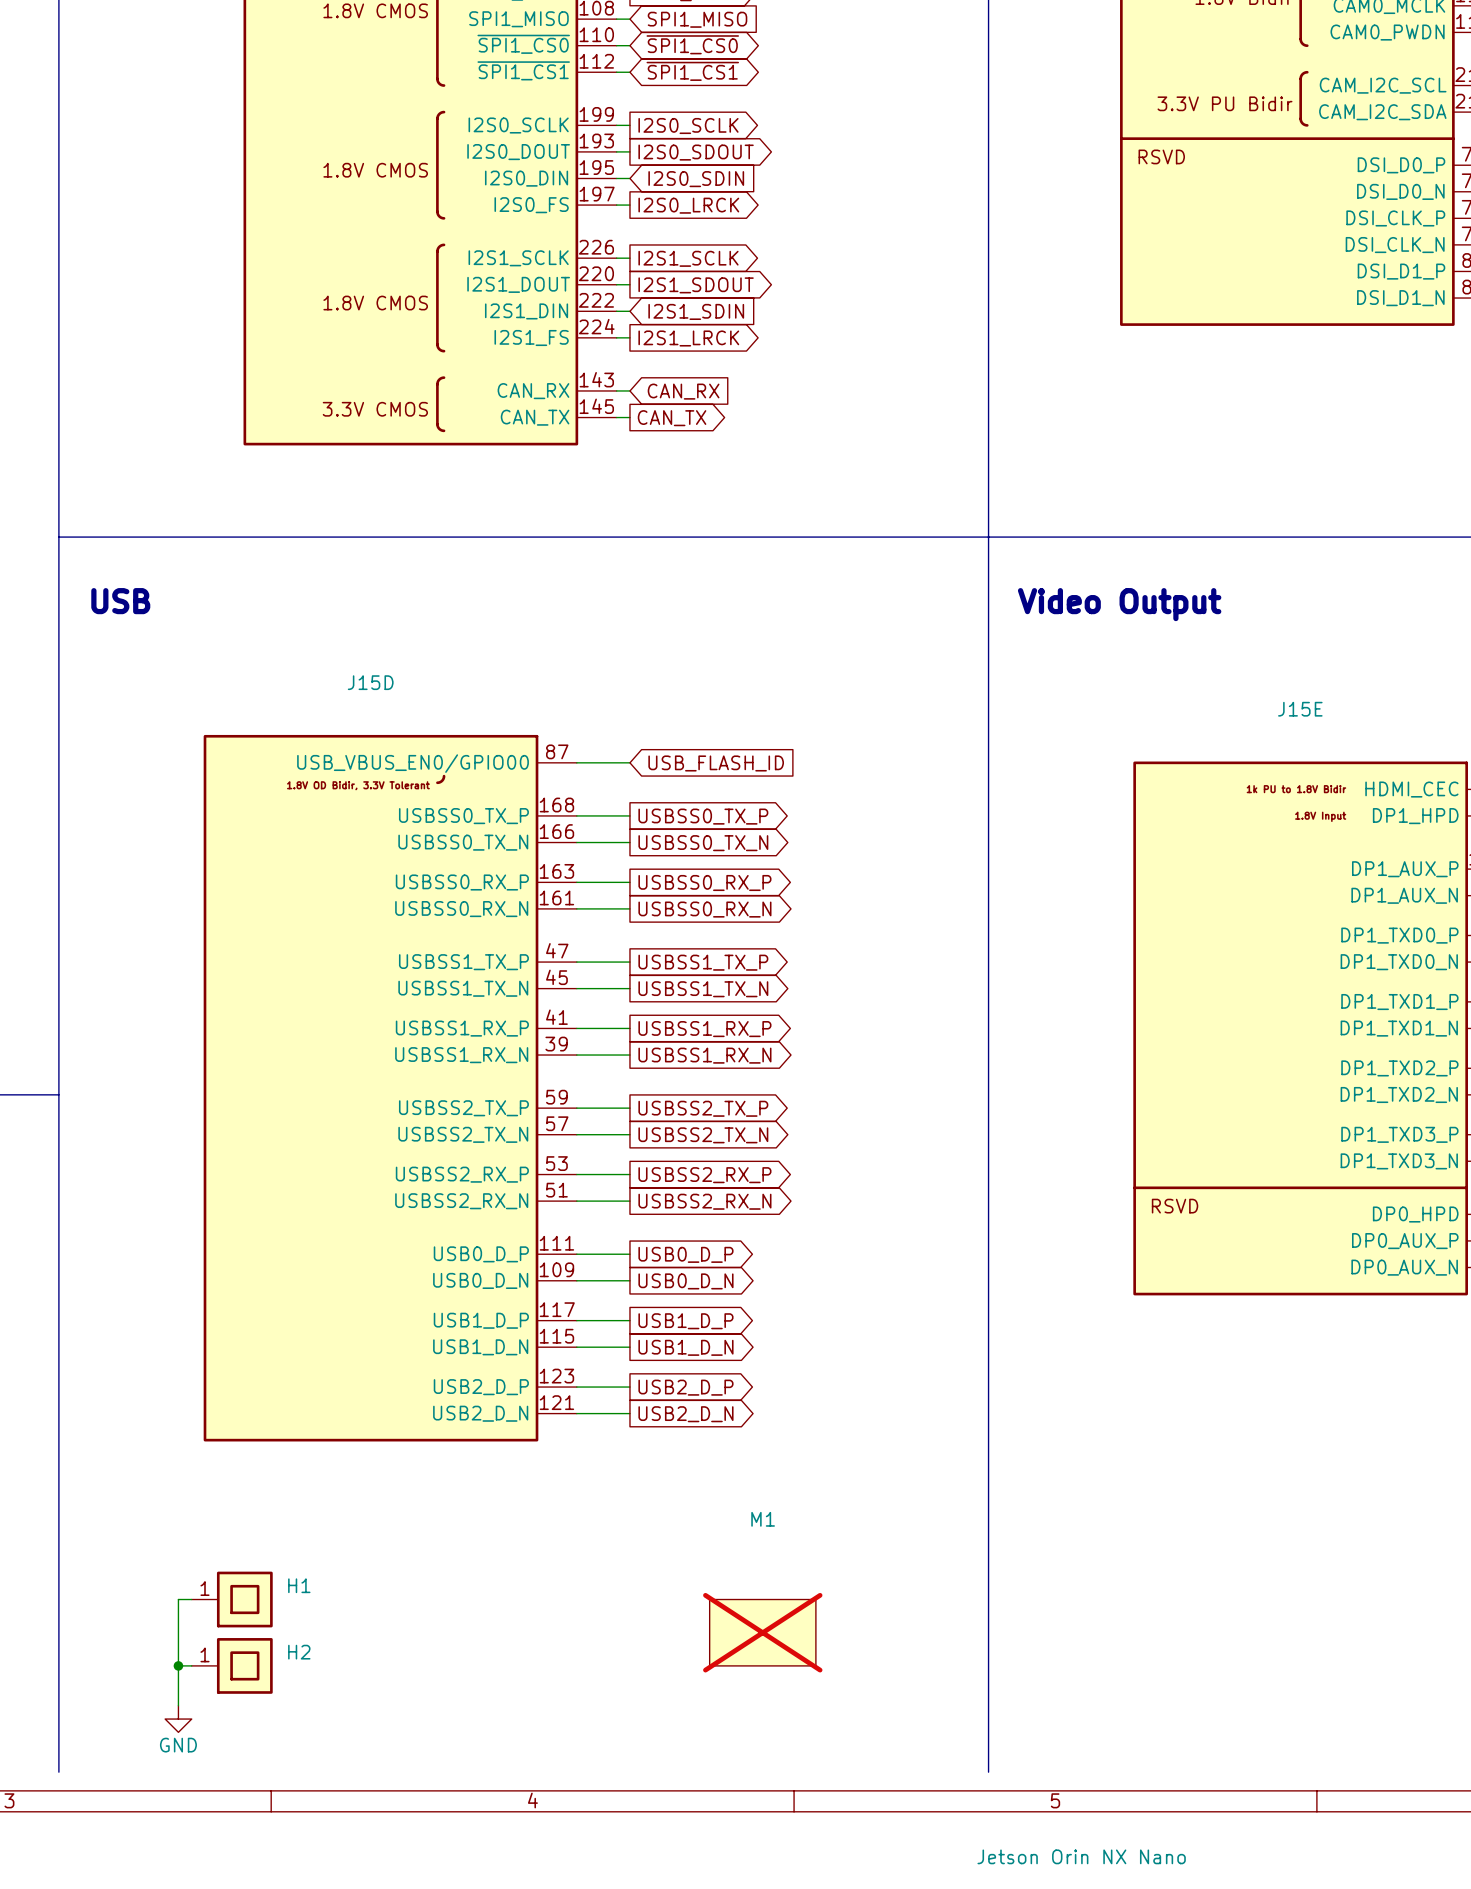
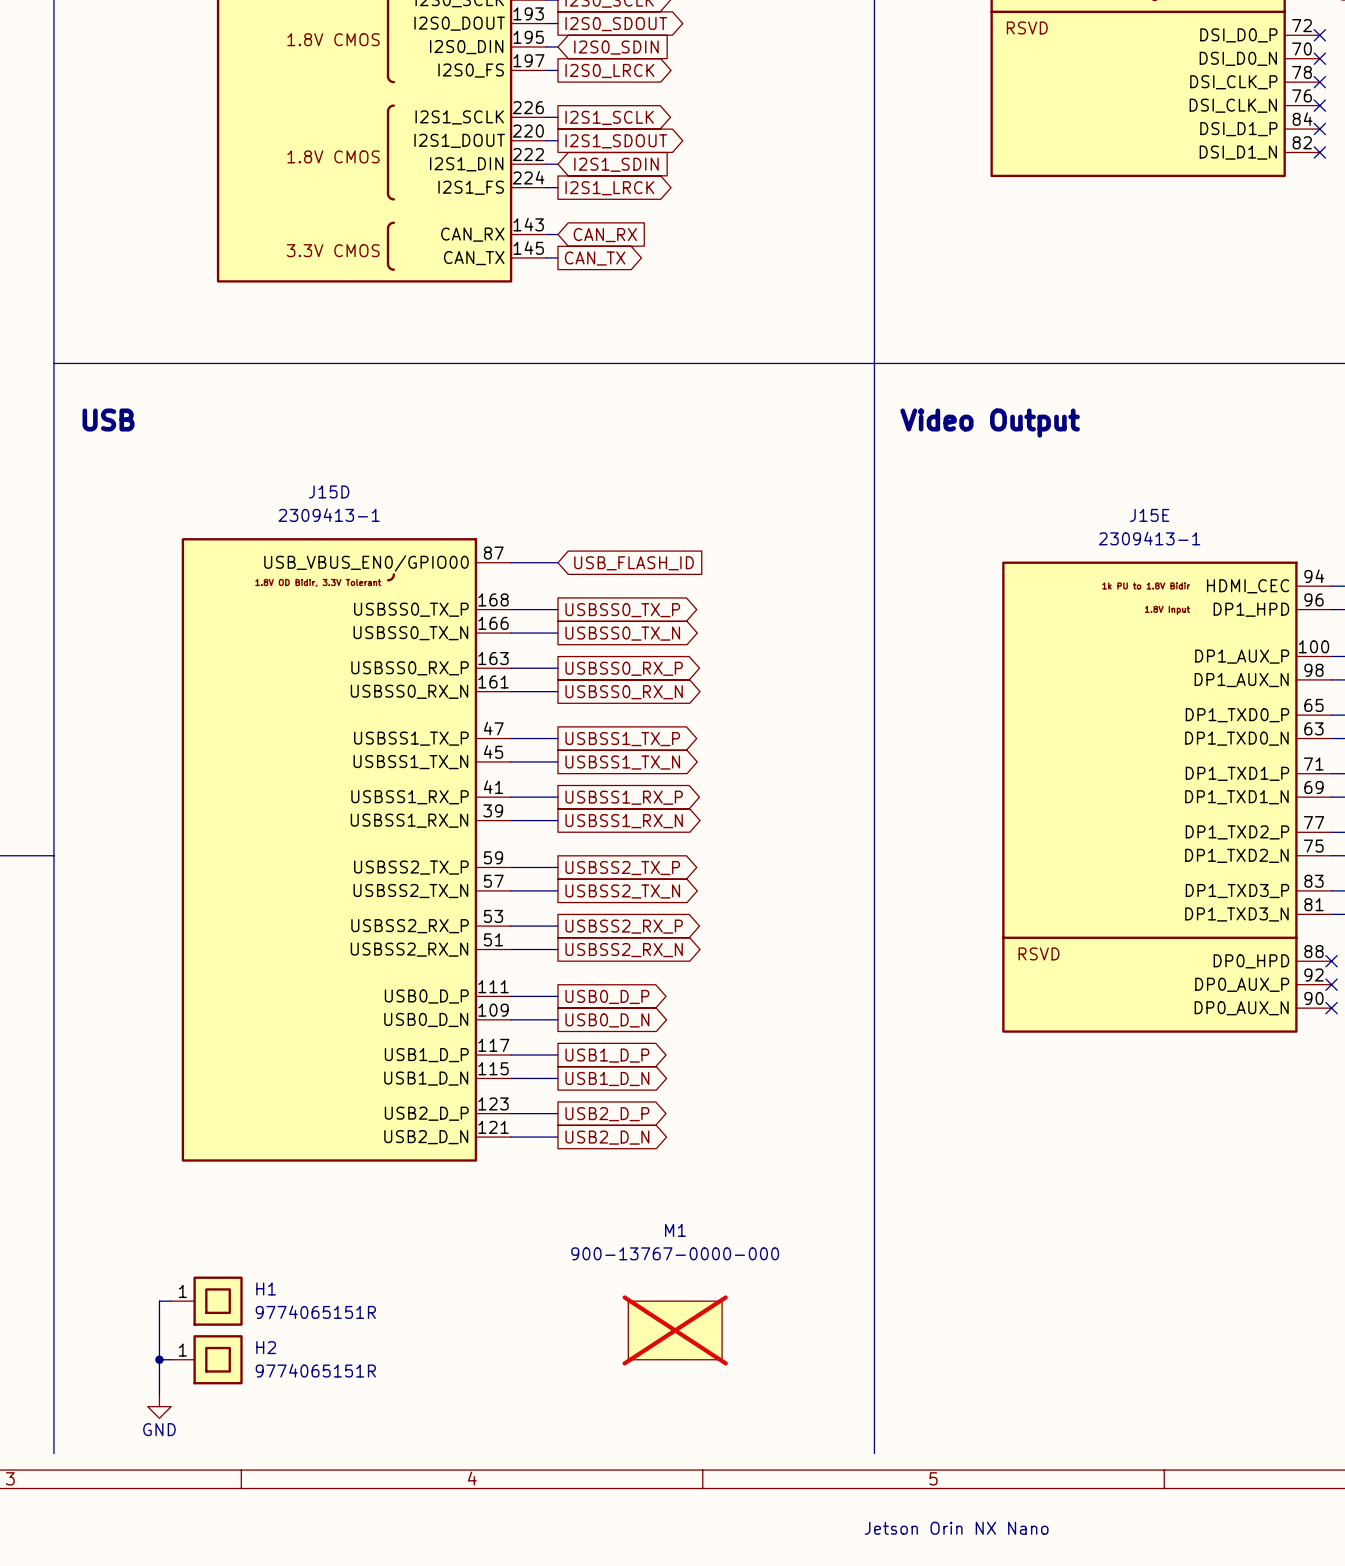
J15D text: none -> 2309413-1 (329, 515)
J15E text: none -> 2309413-1 (1149, 538)
M1 text: none -> 900-13767-0000-000 (675, 1253)
H1 text: none -> 9774065151R (315, 1312)
H2 text: none -> 9774065151R (315, 1370)

